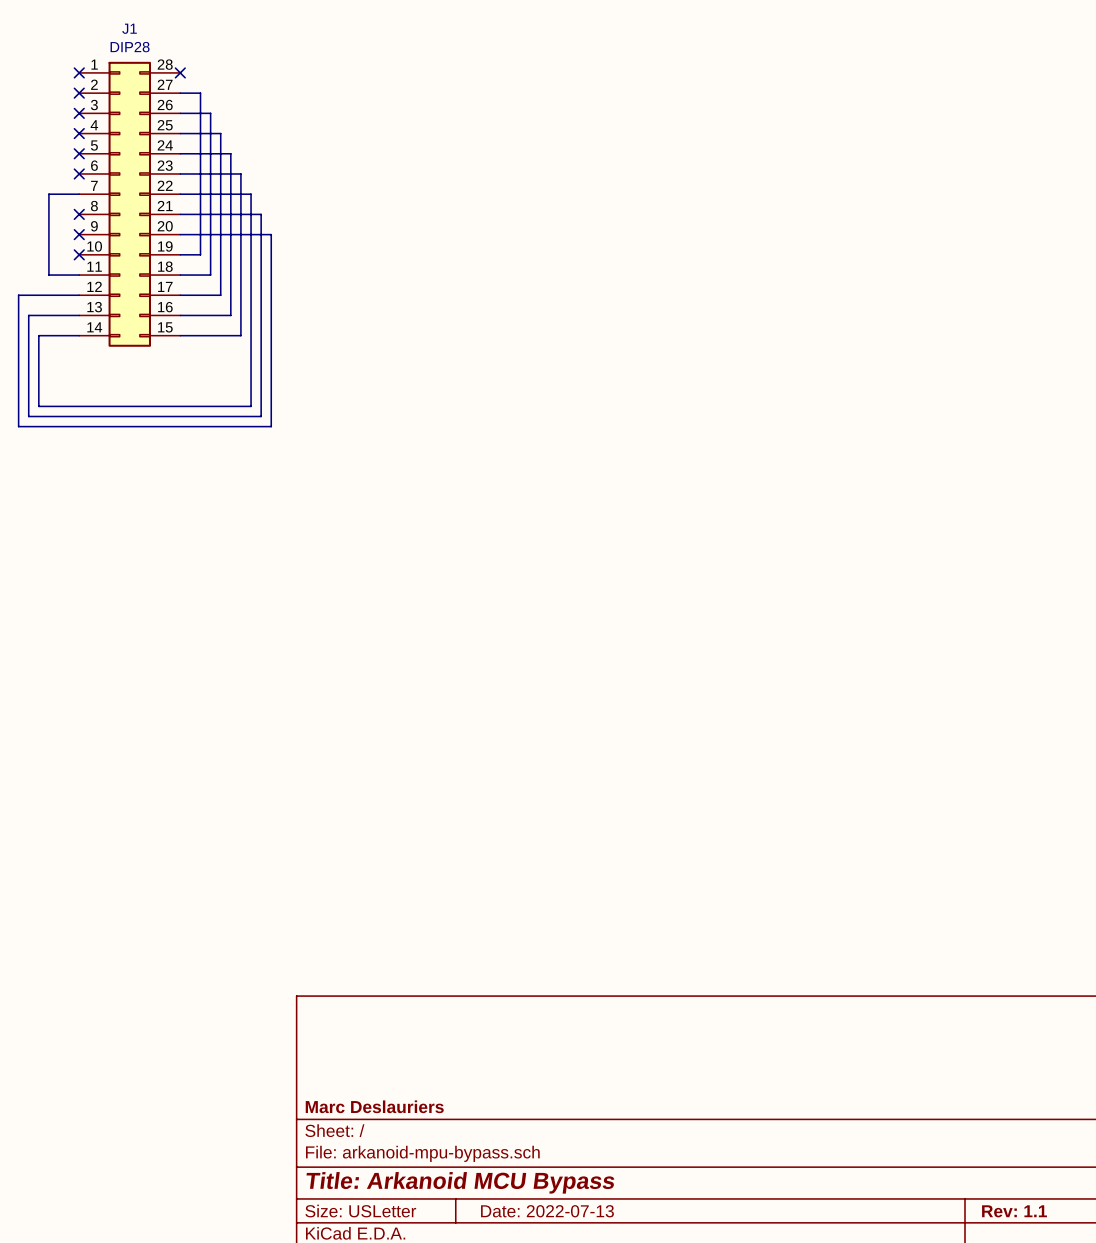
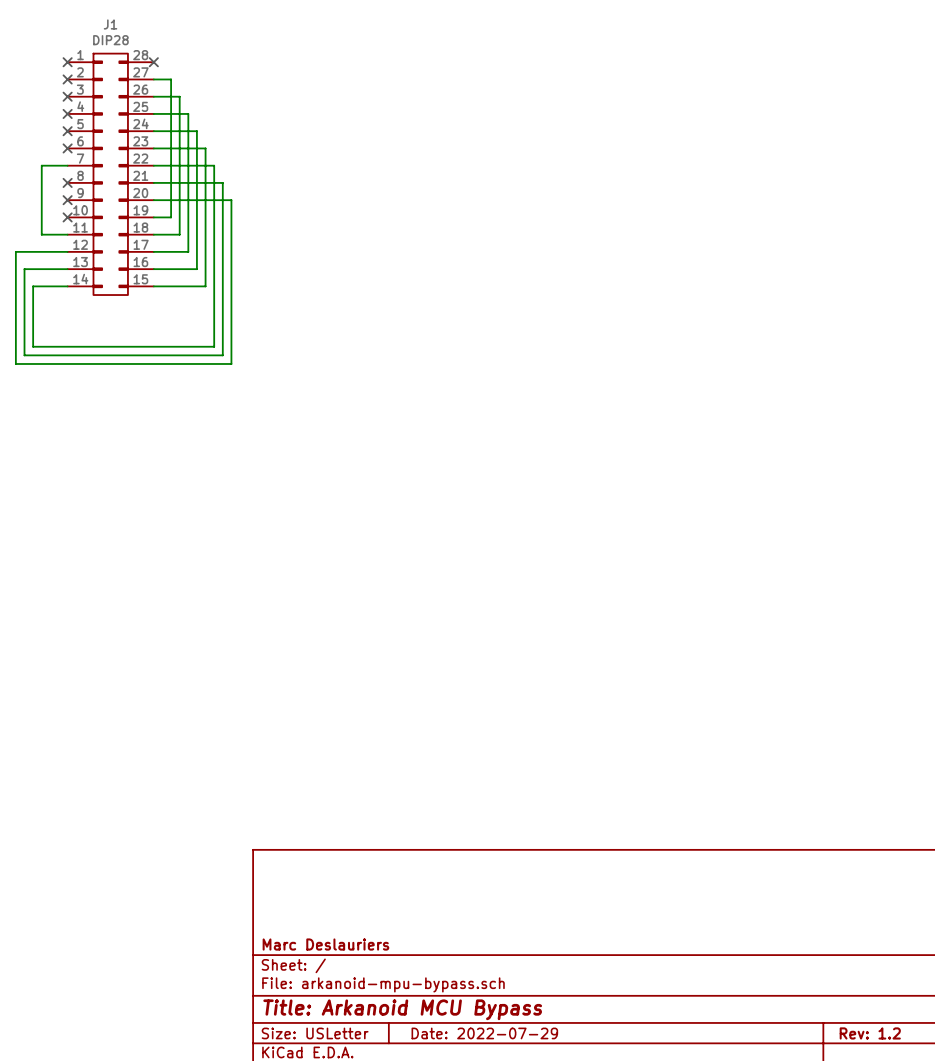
title block: Date: 2022-07-13 (547, 1211) -> Date: 2022-07-29 (484, 1033)
title block: Rev: 1.1 (1014, 1211) -> Rev: 1.2 (870, 1033)

